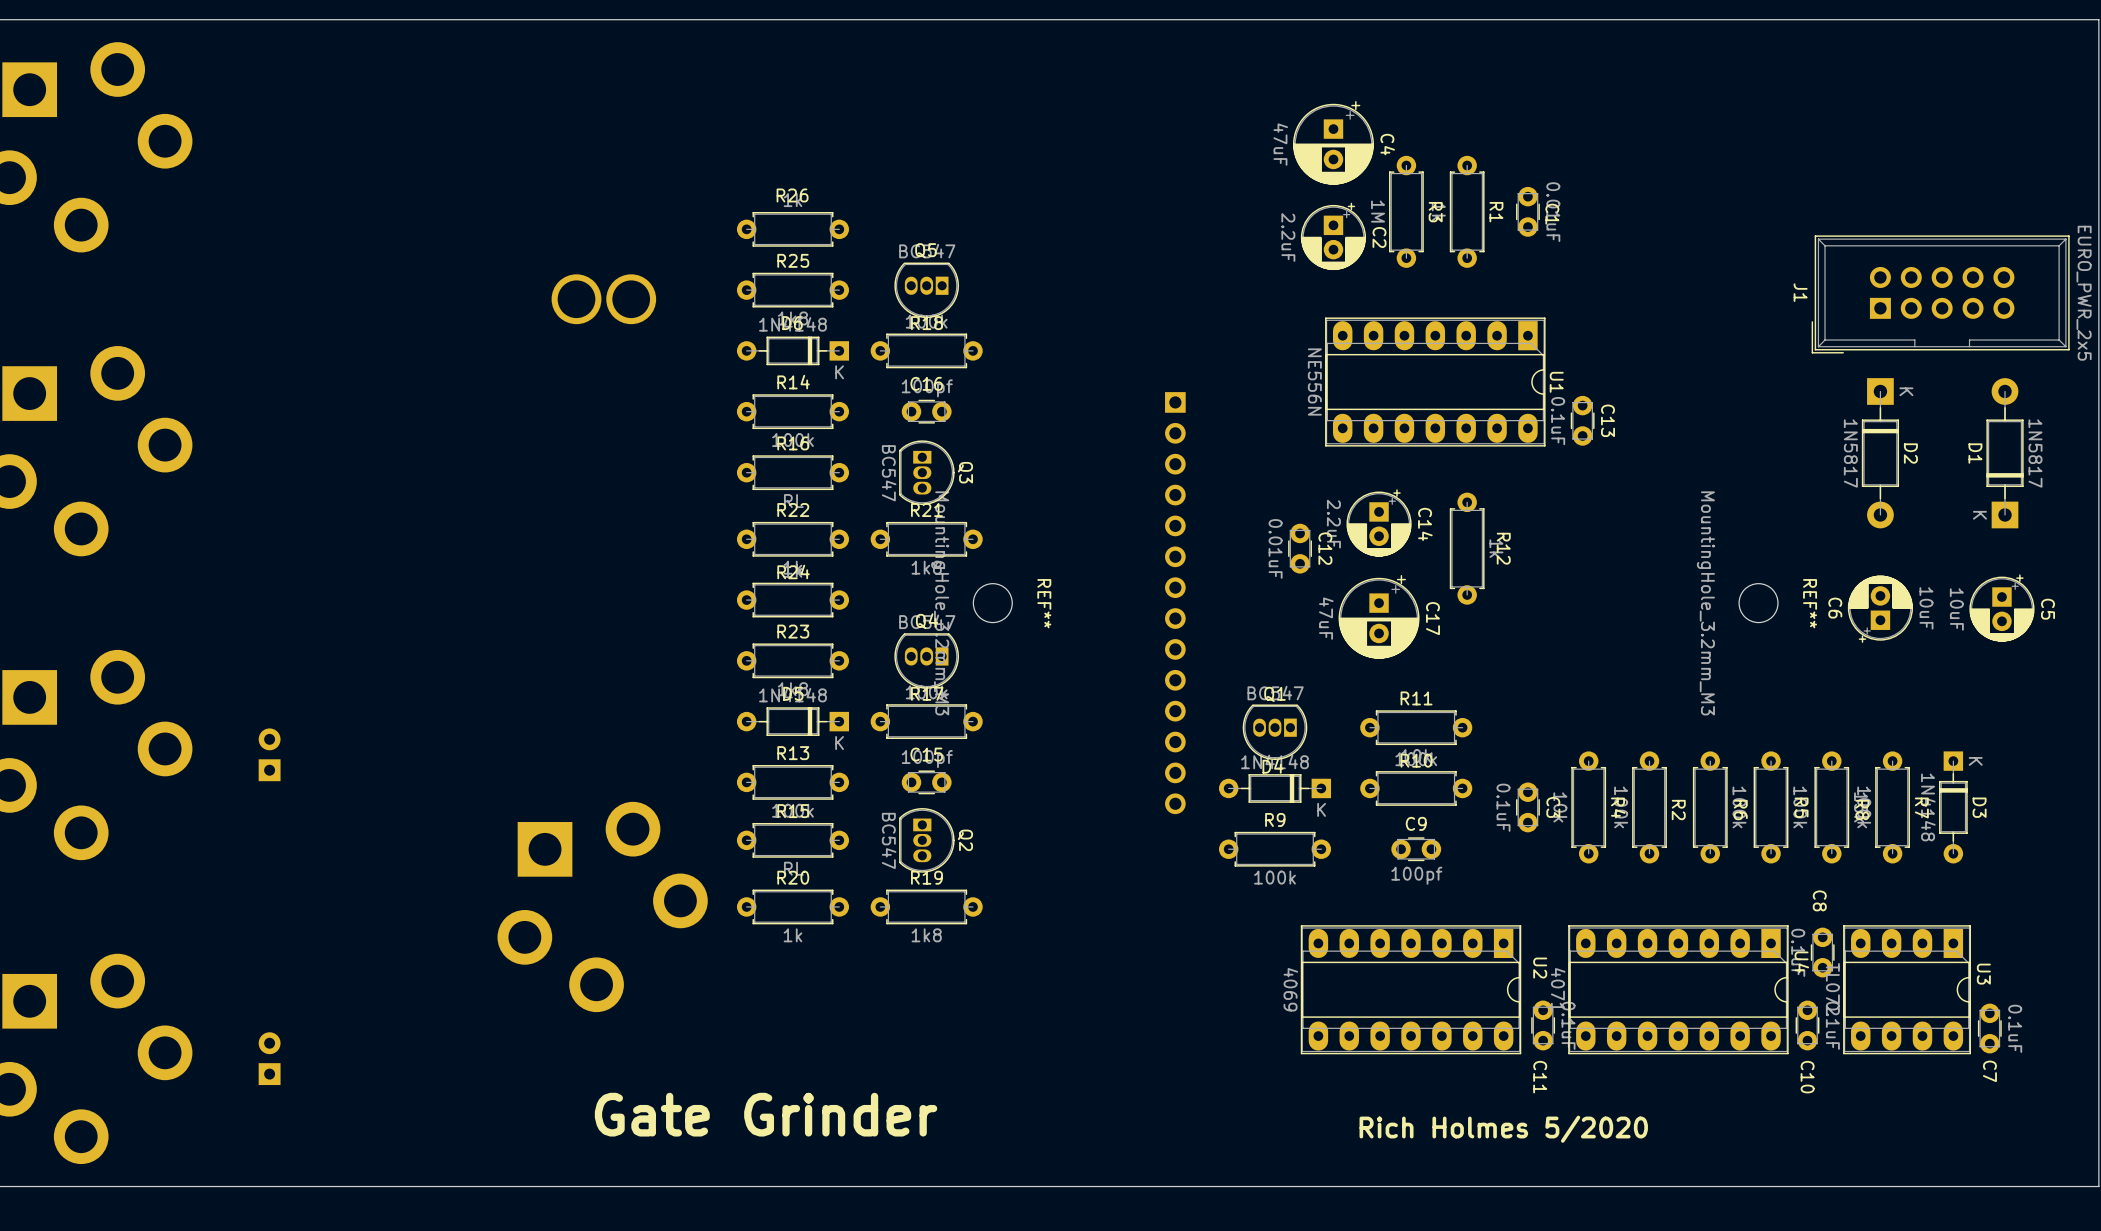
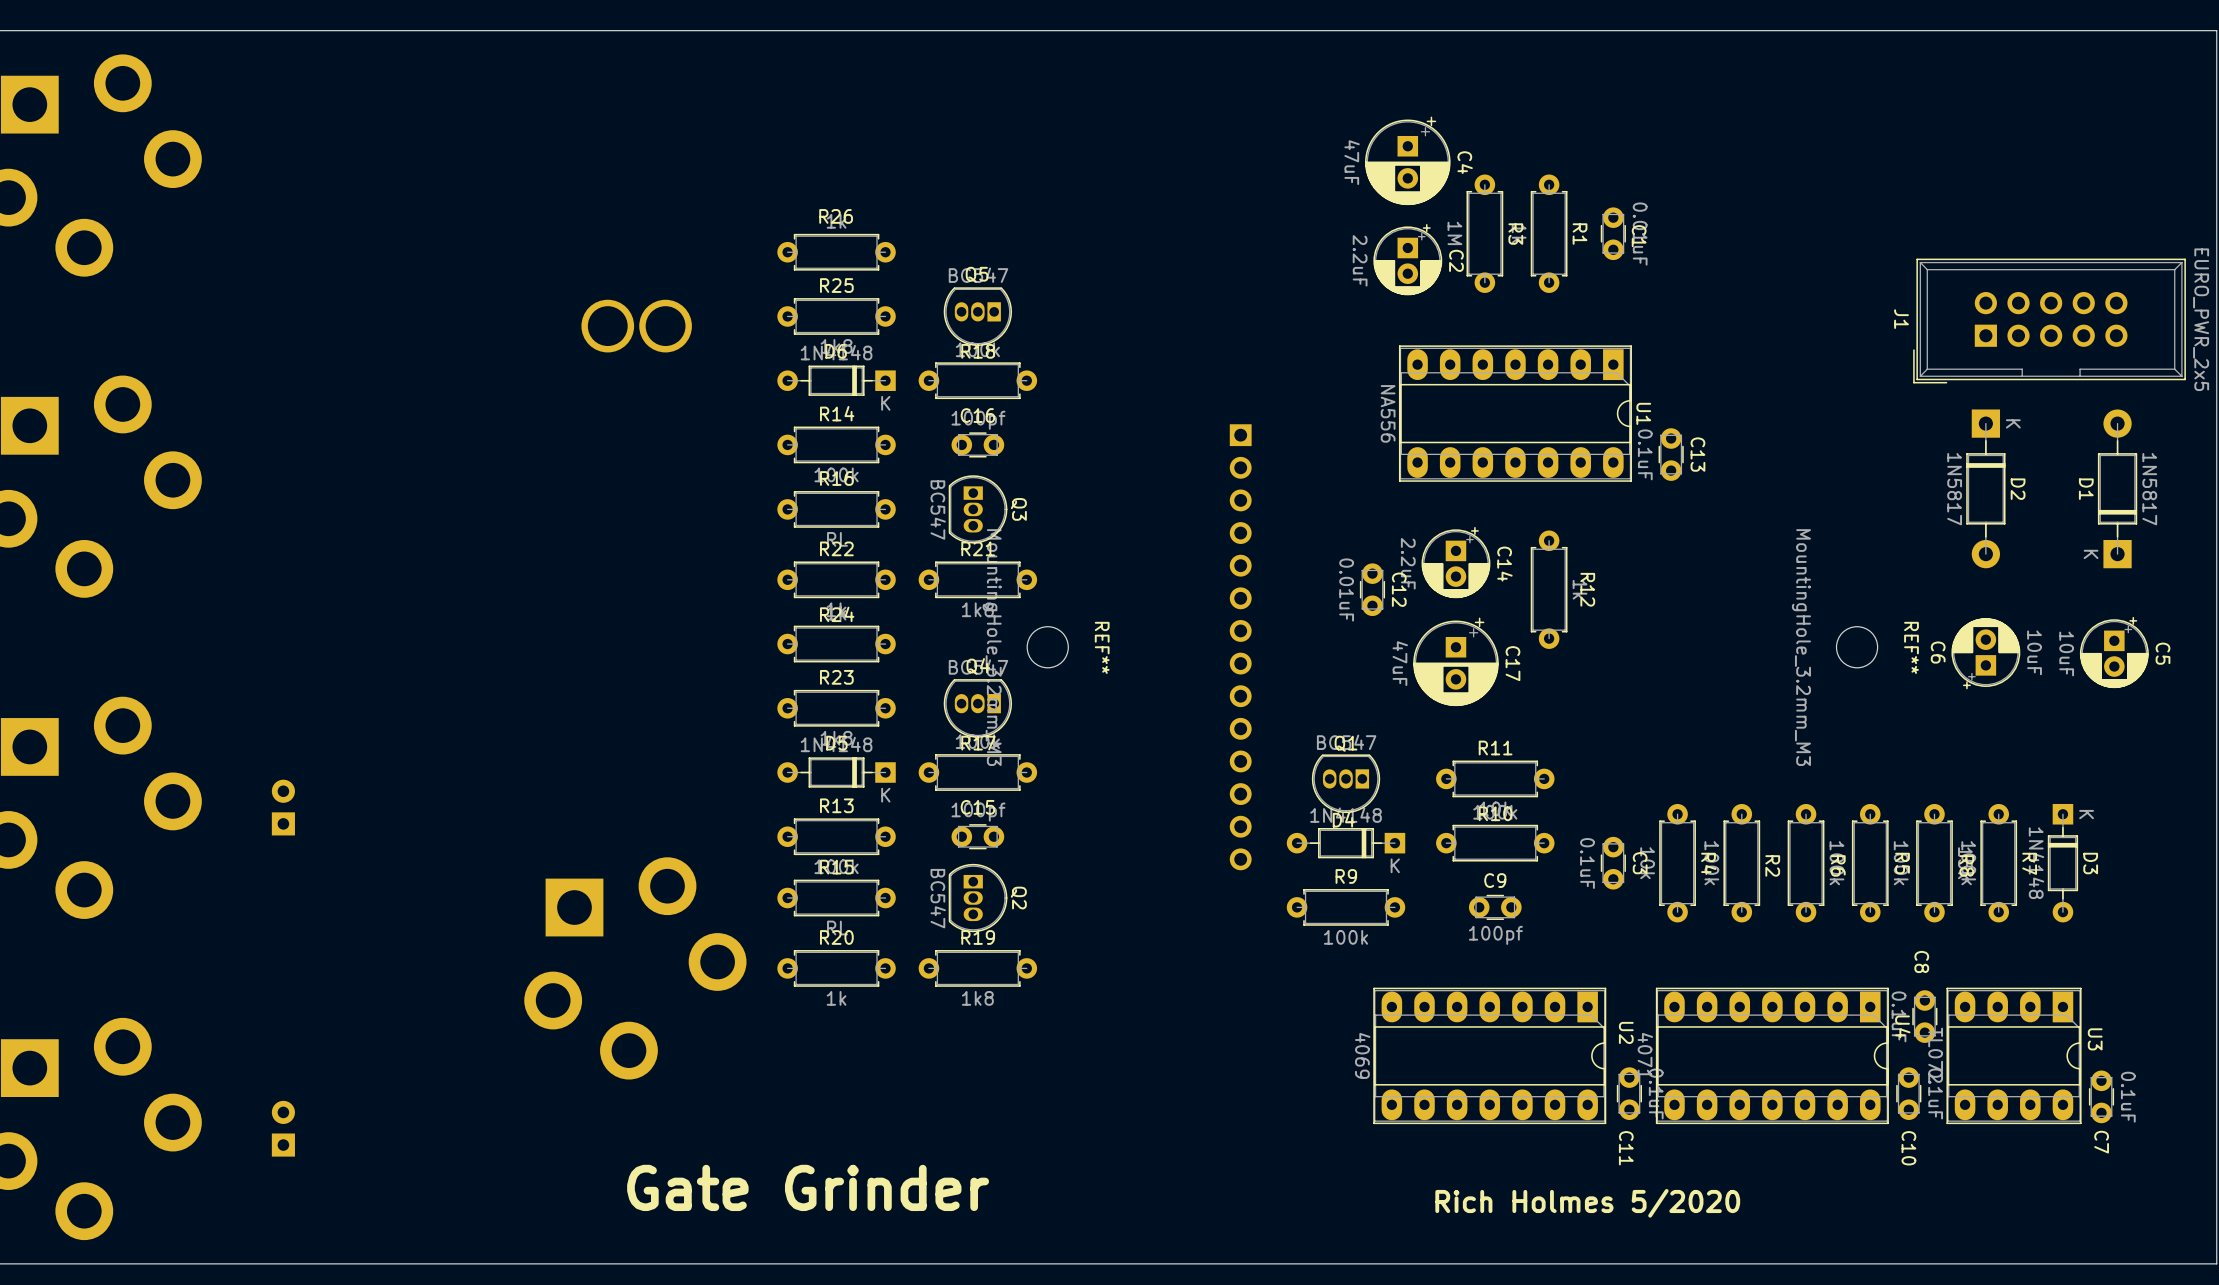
U1 value: NE556N (1314, 382) -> NA556 (1388, 413)

